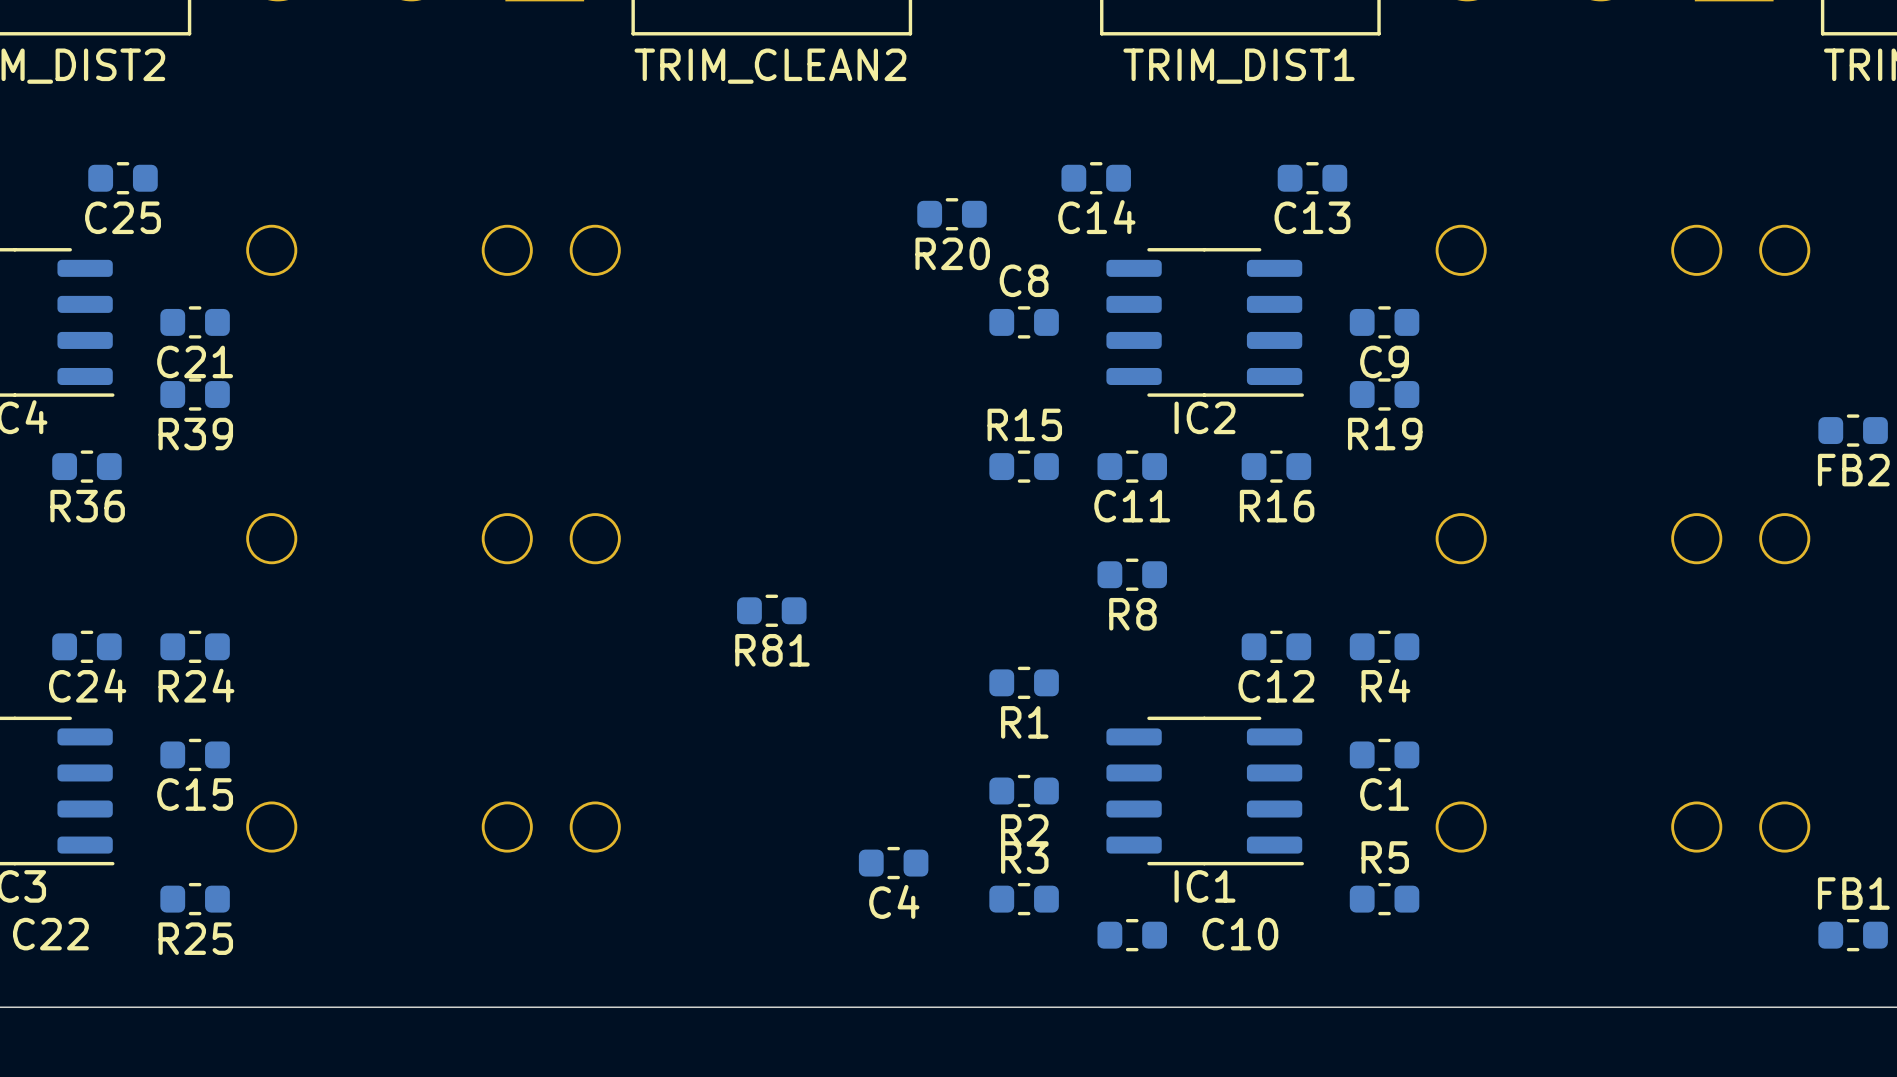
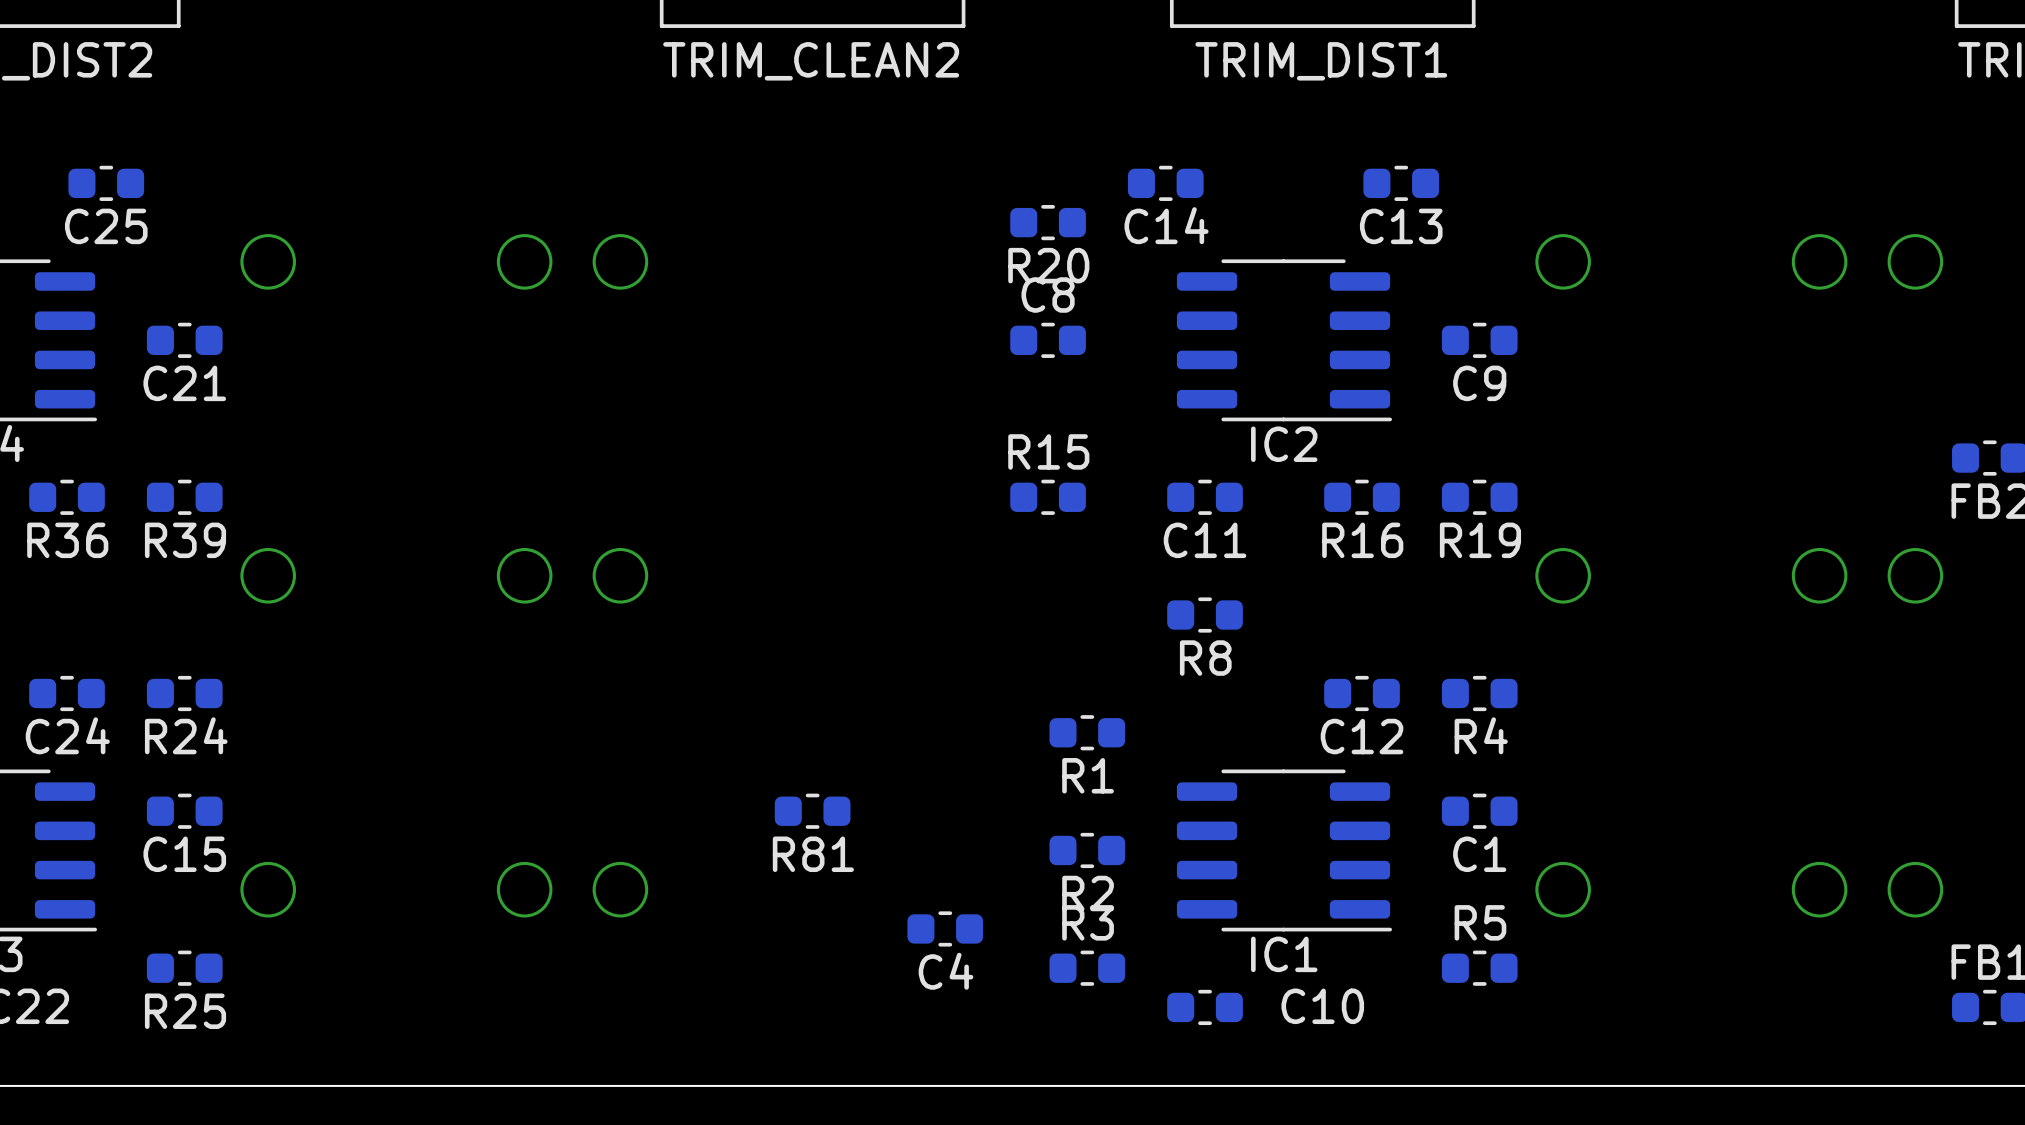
R20 position: (952, 214) -> (1048, 222)
C8 position: (1024, 322) -> (1048, 340)
R39 position: (195, 394) -> (184, 497)
R19 position: (1384, 394) -> (1479, 497)
R15 position: (1024, 466) -> (1048, 497)
R81 position: (771, 610) -> (812, 811)

